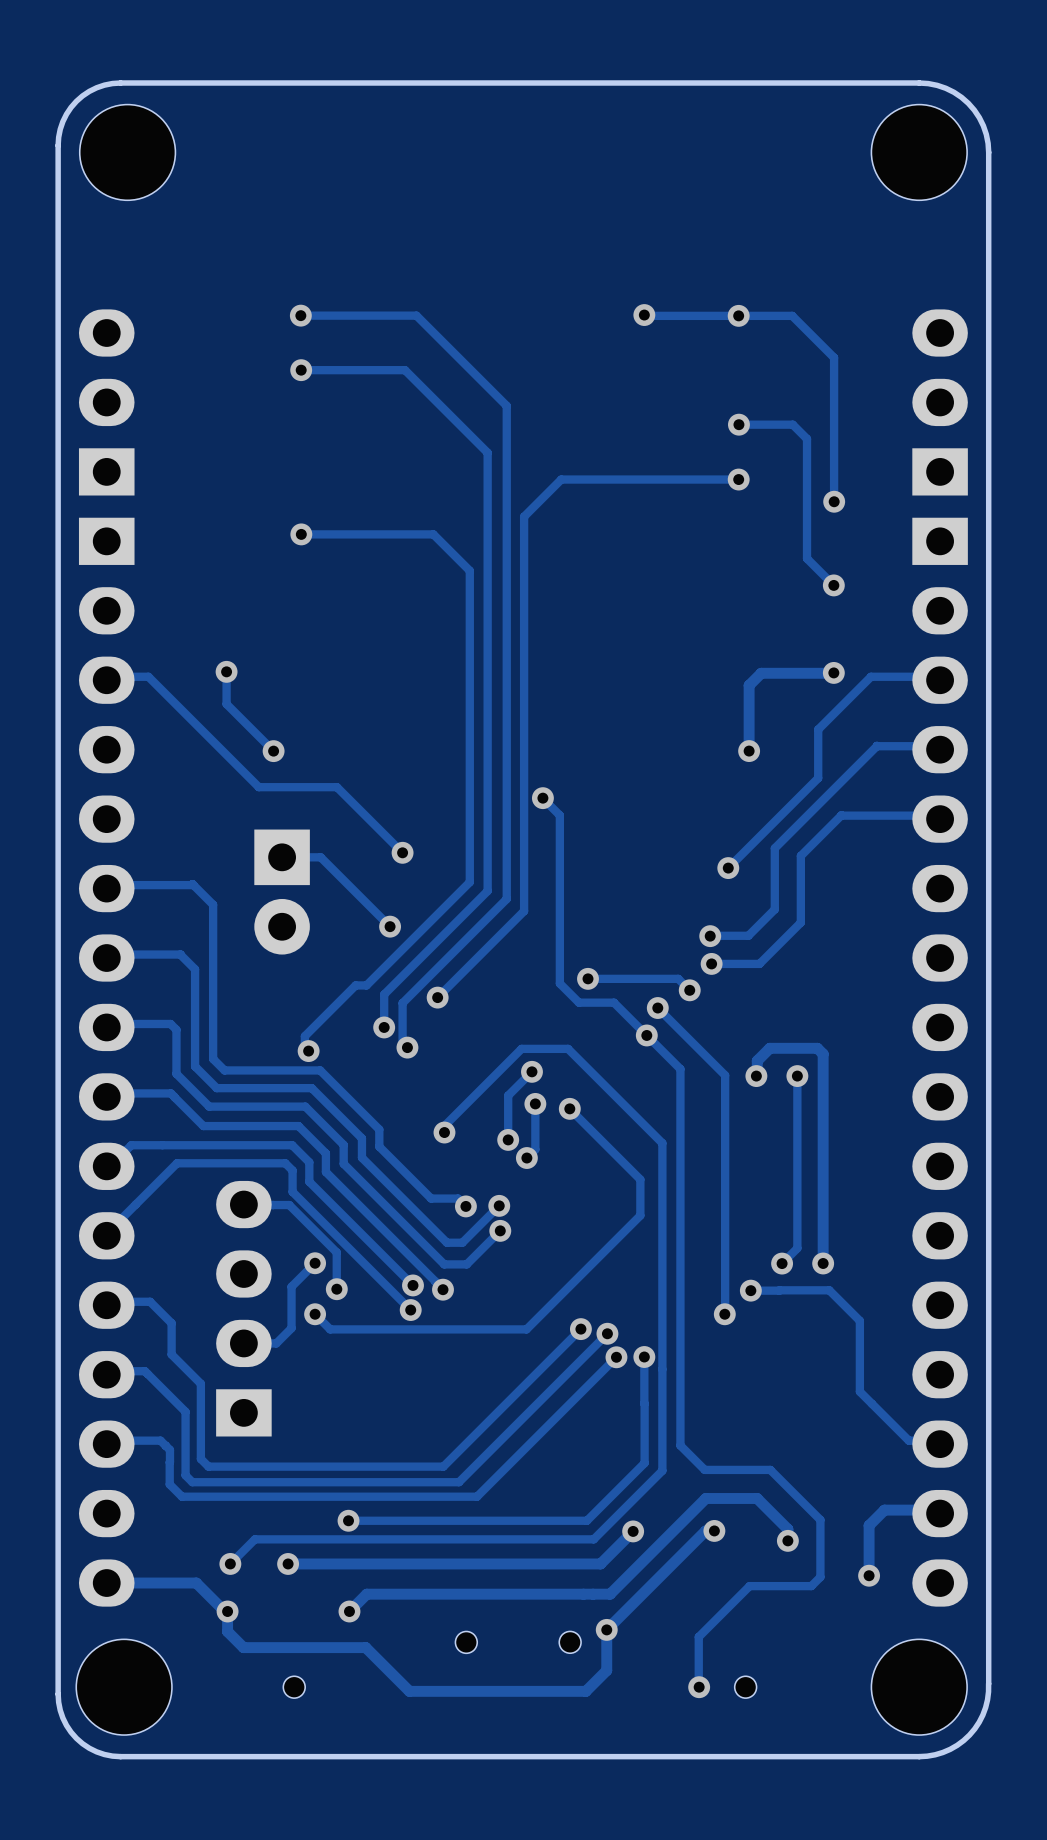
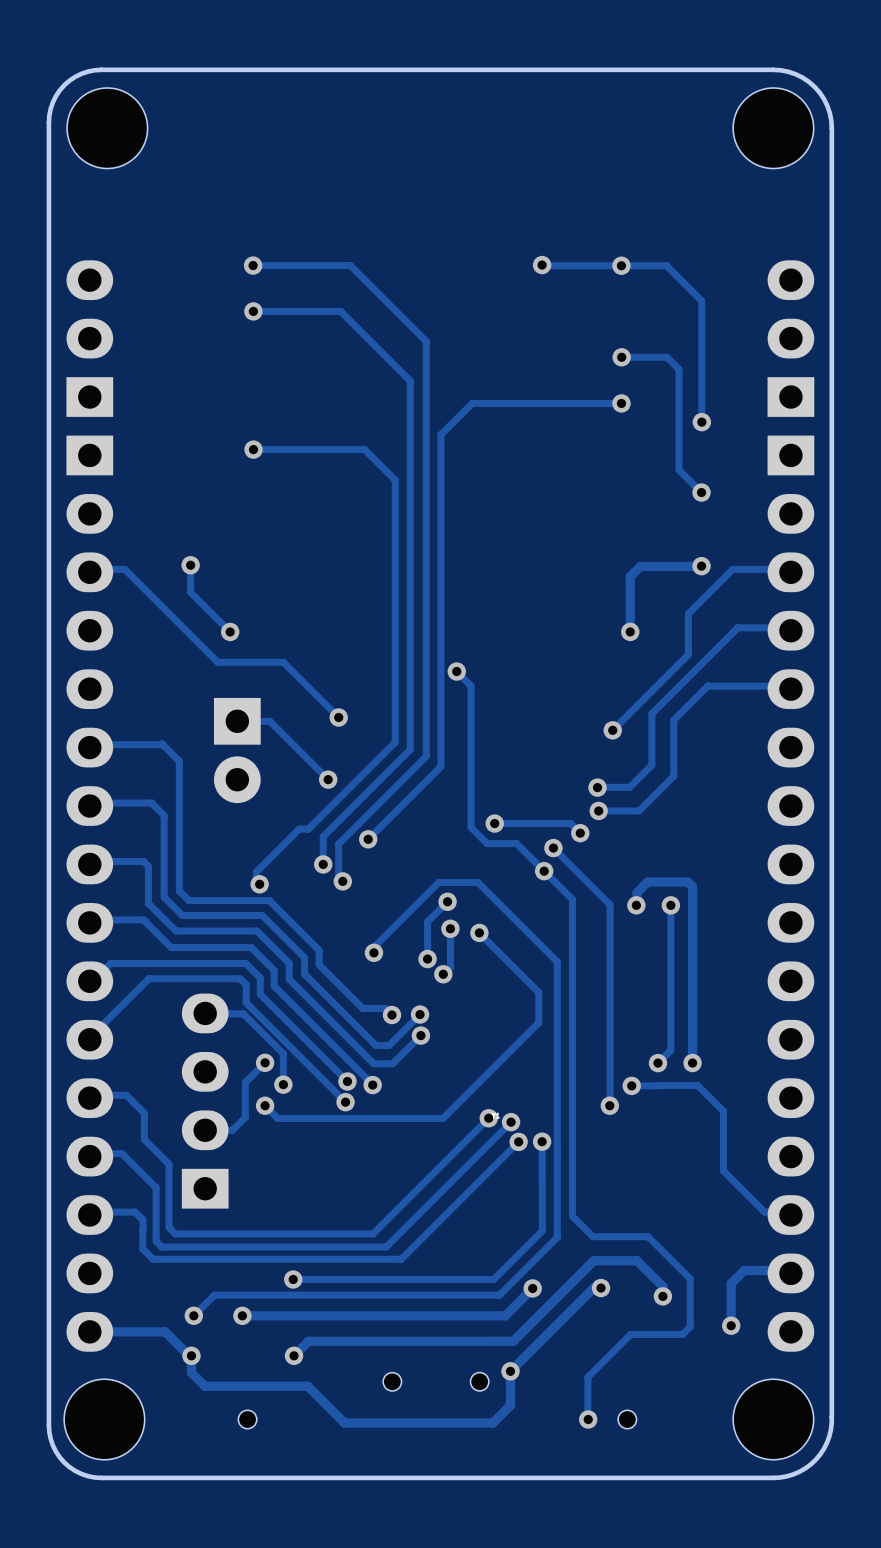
part: none -> (495, 1115)

